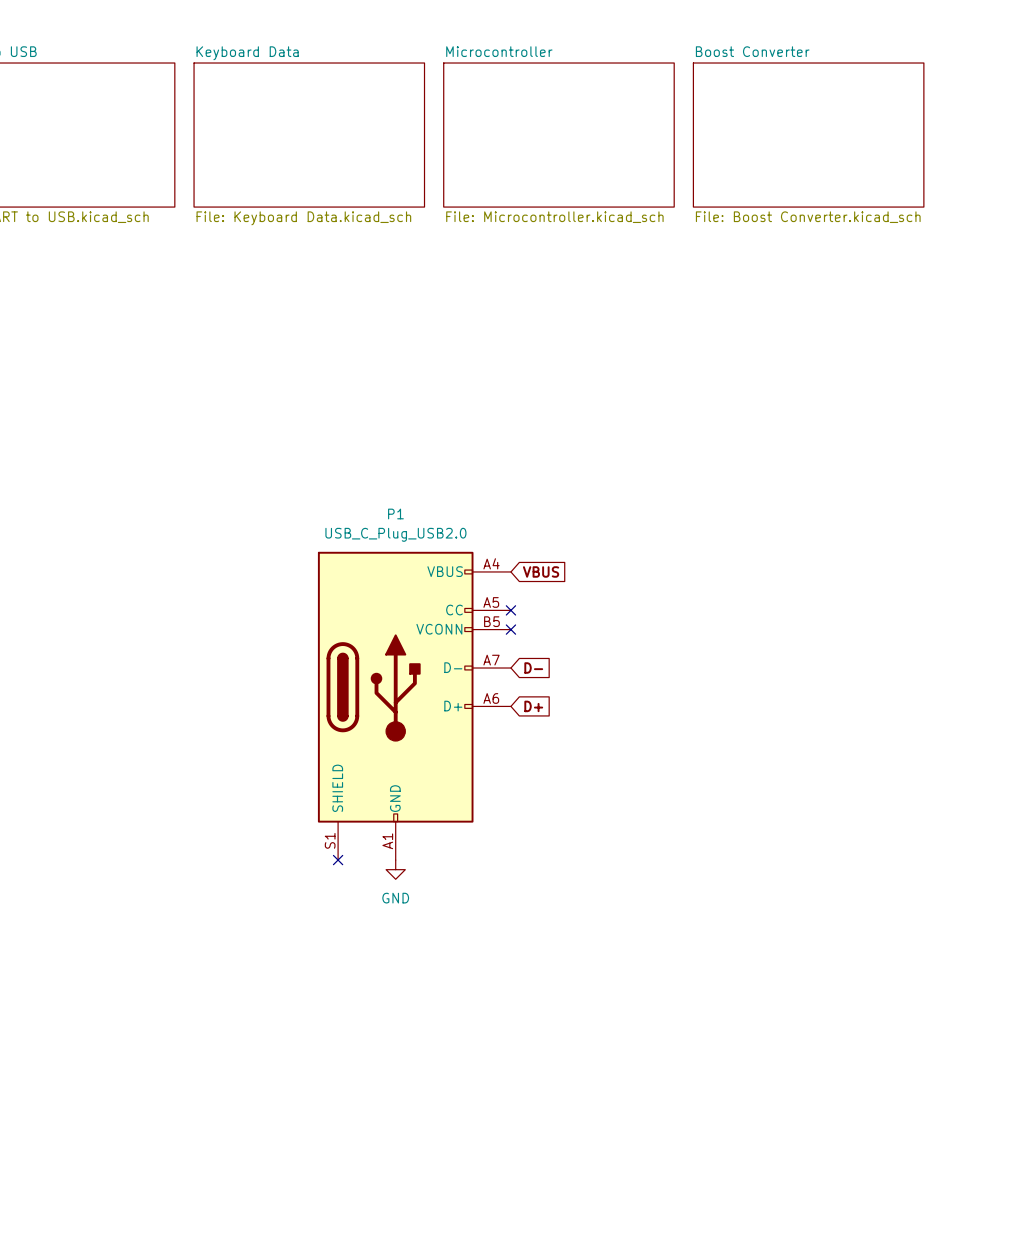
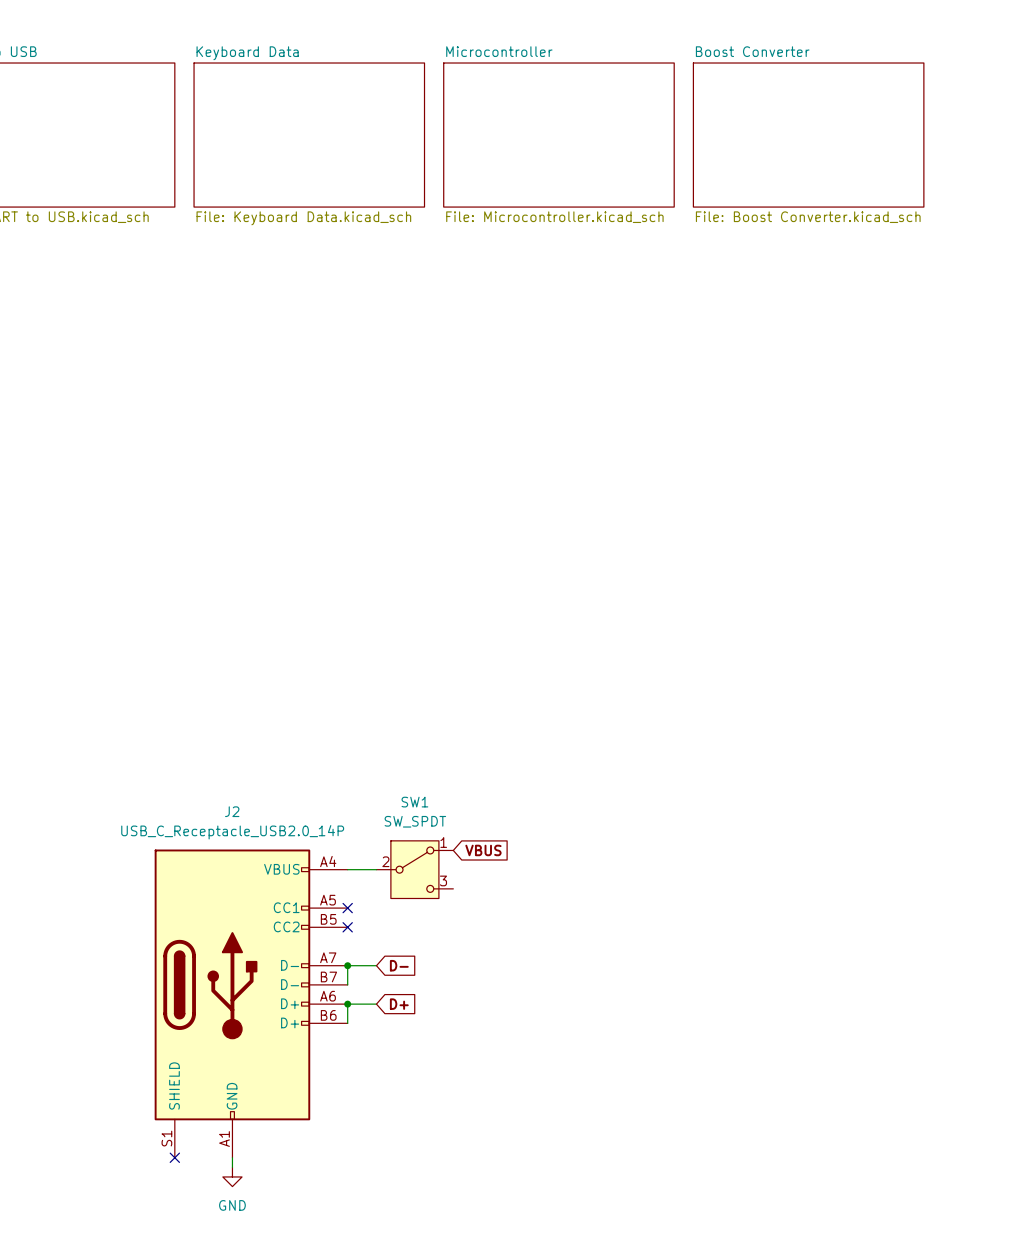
global label: VBUS (541, 571) -> none
no-connect mark: (510, 610) -> none
no-connect mark: (510, 629) -> none
global label: D- (533, 668) -> none
P1: USB_C_Plug_USB2.0 (414, 705) -> none
global label: D+ (533, 706) -> none
global label: none -> VBUS (483, 850)
no-connect mark: (338, 860) -> none
wire: none -> (347, 869) (376, 869)
power symbol: GND (395, 869) -> none
SW1: none -> SW_SPDT (414, 869)
no-connect mark: none -> (347, 908)
no-connect mark: none -> (347, 927)
junction: none -> (347, 965)
wire: none -> (376, 965) (347, 965) (347, 984)
global label: none -> D- (399, 965)
J2: none -> USB_C_Receptacle_USB2.0_14P (251, 1003)
junction: none -> (347, 1004)
wire: none -> (376, 1004) (347, 1004) (347, 1023)
global label: none -> D+ (399, 1004)
no-connect mark: none -> (174, 1157)
wire: none -> (232, 1157) (232, 1167)
power symbol: none -> GND (232, 1176)

